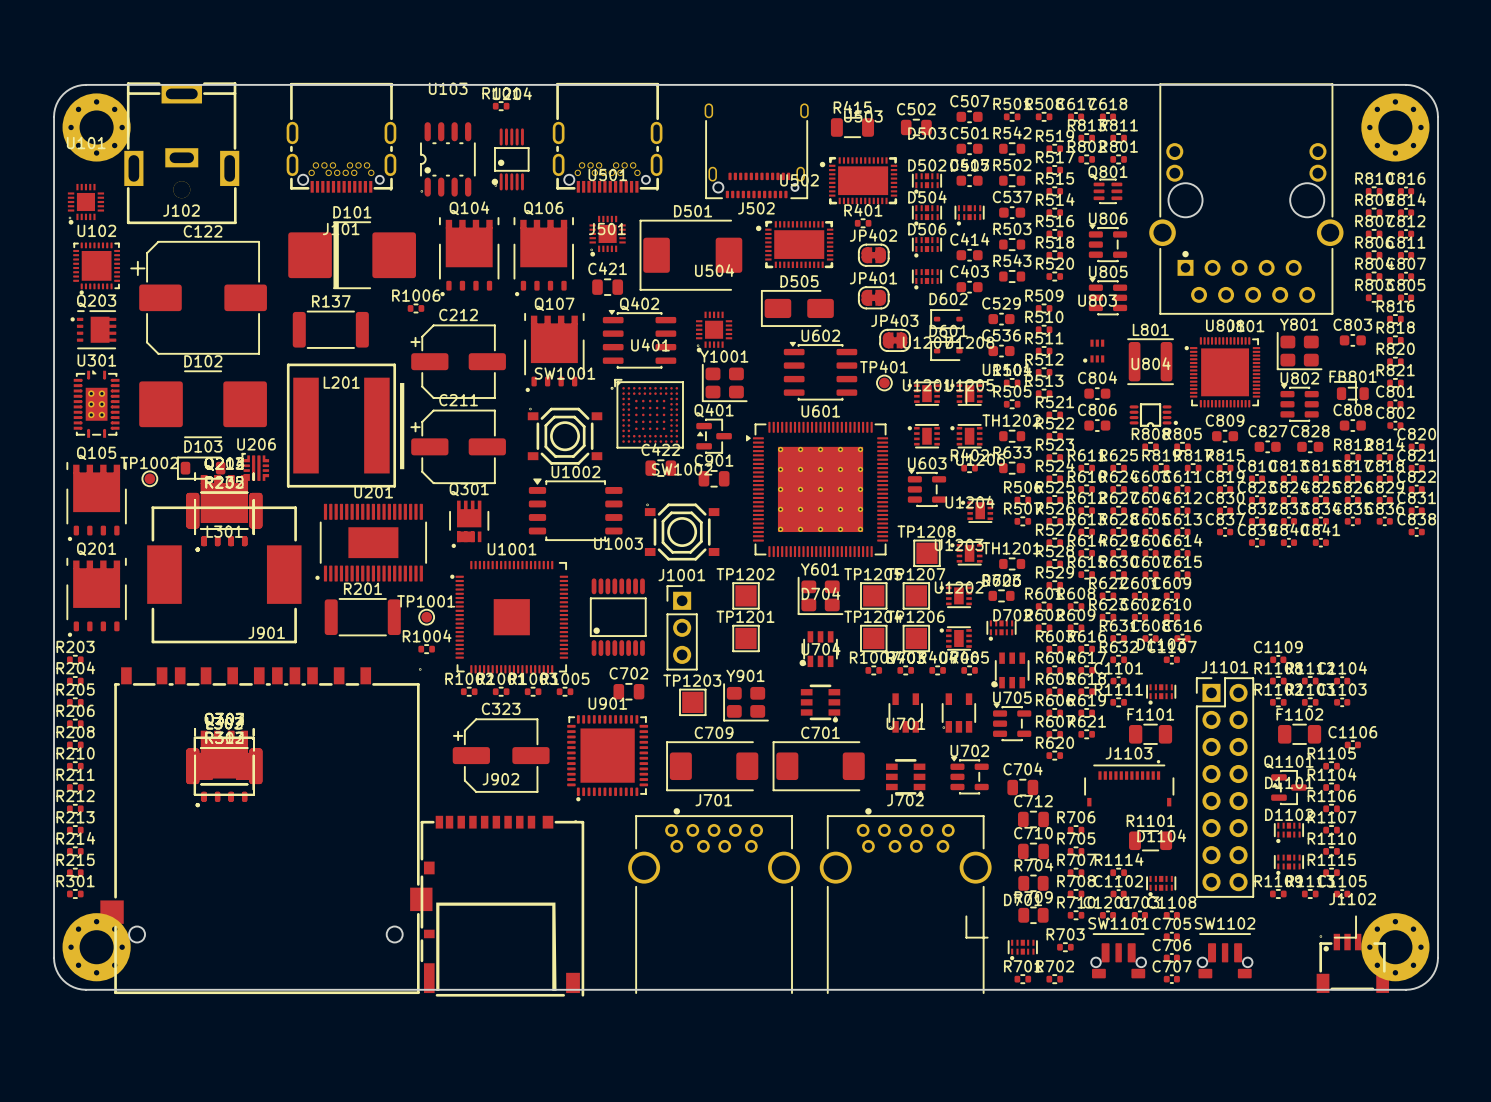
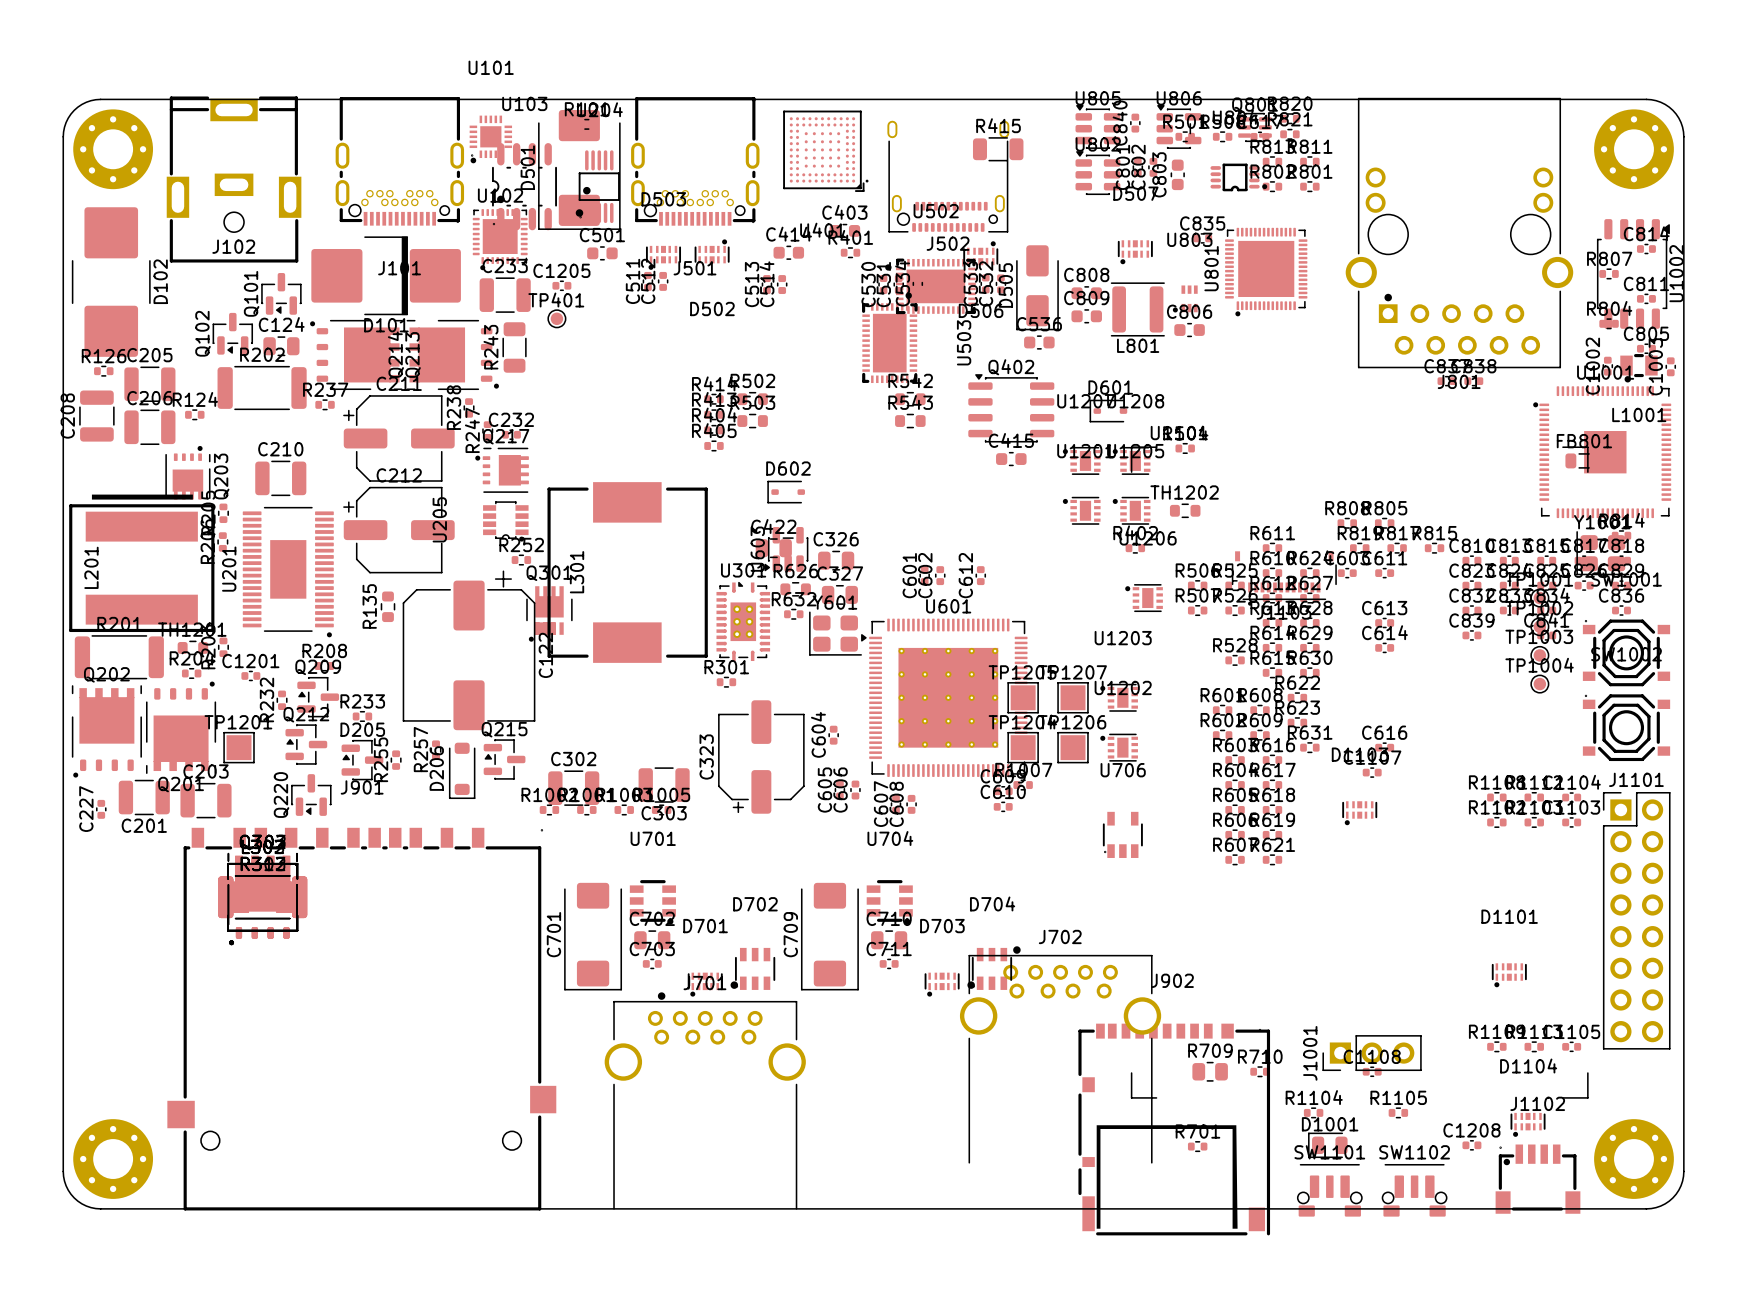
J102 footprint: [124, 82, 240, 225] -> [166, 96, 302, 263]
C507: (969, 116) -> none
C618: (1107, 116) -> none
C502: (916, 127) -> none
J501 position: (607, 137) -> (695, 161)
C501 position: (969, 148) -> (602, 253)
R542 position: (1012, 148) -> (910, 399)
R519: (1054, 148) -> none
J502 position: (756, 151) -> (948, 176)
R517: (1054, 170) -> none
U503 rotation: 0° (858, 180) -> 90° clockwise (889, 337)
U503 position: (858, 180) -> (889, 337)
C415 position: (969, 180) -> (1011, 459)
R502 position: (1012, 180) -> (752, 399)
D503 position: (926, 183) -> (663, 257)
Q801 position: (1107, 190) -> (1254, 126)
R515: (1054, 191) -> none
R810: (1374, 191) -> none
C816: (1406, 191) -> none
U101 position: (85, 204) -> (490, 139)
C537: (1012, 212) -> none
R514: (1054, 212) -> none
R809: (1374, 212) -> none
D502 rotation: 0° (926, 215) -> 180° (712, 251)
D502 position: (926, 215) -> (712, 251)
R401 position: (863, 223) -> (850, 252)
R516: (1054, 233) -> none
C812: (1406, 233) -> none
U501: (607, 236) -> none
C511: none -> (647, 281)
C512: none -> (663, 281)
C513: none -> (766, 284)
C514: none -> (782, 284)
C530: none -> (883, 284)
C531: none -> (898, 284)
C534: none -> (917, 283)
C533: none -> (985, 283)
C532: none -> (1000, 283)
U806 position: (1107, 243) -> (1178, 126)
C1205: none -> (561, 285)
R503 position: (1012, 244) -> (752, 421)
D504: (926, 247) -> none
Q101: none -> (281, 293)
C233: none -> (505, 295)
D101 rotation: 0° (352, 255) -> 180° (386, 275)
D501 rotation: 0° (691, 255) -> 90° counterclockwise (579, 169)
D501 position: (691, 255) -> (579, 169)
JP402: (873, 255) -> none
C414 position: (969, 255) -> (788, 252)
R518: (1054, 255) -> none
R806: (1374, 255) -> none
Q104: (469, 256) -> none
Q106: (543, 256) -> none
U102 position: (96, 268) -> (500, 239)
R543 position: (1012, 276) -> (910, 421)
R520: (1054, 276) -> none
C807: (1406, 276) -> none
D506 rotation: 0° (926, 279) -> 180° (980, 253)
D506 position: (926, 279) -> (980, 253)
Q102: none -> (232, 333)
C421: (607, 287) -> none
C403 position: (969, 287) -> (844, 230)
C124: none -> (281, 346)
R243: none -> (514, 347)
U805 position: (1107, 296) -> (1097, 126)
C122 rotation: 0° (198, 297) -> 90° clockwise (469, 650)
C122 position: (198, 297) -> (469, 650)
JP401: (873, 297) -> none
R803: (1374, 297) -> none
R1006: (415, 308) -> none
D505 rotation: 0° (797, 308) -> 90° counterclockwise (1037, 287)
D505 position: (797, 308) -> (1037, 287)
R509: (1044, 308) -> none
C1002: none -> (1607, 366)
C1003: none -> (1670, 366)
L1001: none -> (1638, 368)
R126: none -> (103, 371)
D602 position: (946, 319) -> (786, 492)
C529: (1001, 319) -> none
R816: (1395, 319) -> none
C212 footprint: [410, 324, 506, 399] -> [343, 486, 455, 574]
C803 name position: C803 (1352, 324) -> C803 (1159, 174)
C205: none -> (149, 384)
Q203 rotation: 0° (93, 329) -> 90° clockwise (187, 472)
Q203 position: (93, 329) -> (187, 472)
R137: (330, 329) -> none
R510: (1044, 329) -> none
L801 name position: L801 (1150, 329) -> L801 (1138, 345)
U504: (714, 332) -> none
Q402 position: (639, 339) -> (1011, 408)
R414: none -> (713, 399)
JP403: (895, 340) -> none
C803 rotation: 0° (1352, 340) -> 90° clockwise (1177, 174)
C803 position: (1352, 340) -> (1177, 174)
R818: (1395, 340) -> none
R237: none -> (325, 404)
R238: none -> (469, 407)
C536 position: (1001, 351) -> (1039, 342)
R511: (1044, 351) -> none
U803 position: (1093, 351) -> (1185, 298)
Y801: (1299, 351) -> none
Q107: (554, 352) -> none
R124: none -> (194, 414)
R413: none -> (713, 414)
C208: none -> (96, 416)
L801 position: (1150, 361) -> (1137, 309)
R820 position: (1395, 361) -> (1289, 118)
C206: none -> (149, 427)
R247: none -> (487, 431)
C232: none -> (511, 434)
U602: (820, 371) -> none
R512: (1044, 372) -> none
U801 rotation: 0° (1222, 372) -> 90° counterclockwise (1266, 272)
U801 position: (1222, 372) -> (1266, 272)
Y1001 position: (724, 382) -> (1602, 553)
TP401 position: (884, 382) -> (556, 318)
R821 position: (1395, 382) -> (1289, 134)
R513: (1044, 393) -> none
C804: (1097, 393) -> none
Q217: none -> (502, 470)
U802 position: (1299, 402) -> (1097, 173)
U301 position: (96, 404) -> (743, 621)
D102 rotation: 0° (203, 404) -> 90° clockwise (111, 282)
D102 position: (203, 404) -> (111, 282)
R505: (1012, 404) -> none
C801 rotation: 0° (1395, 404) -> 90° clockwise (1137, 167)
C801 position: (1395, 404) -> (1137, 167)
C210: none -> (280, 478)
U401 rotation: 0° (647, 413) -> 180° (825, 151)
U401 position: (647, 413) -> (825, 151)
R521: (1054, 414) -> none
U804 position: (1153, 415) -> (1238, 177)
L201 rotation: 0° (345, 425) -> 90° counterclockwise (141, 563)
L201 position: (345, 425) -> (141, 563)
C806 position: (1097, 425) -> (1189, 330)
C808 position: (1352, 425) -> (1086, 293)
C802 rotation: 0° (1395, 425) -> 90° clockwise (1153, 167)
C802 position: (1395, 425) -> (1153, 167)
SW1001 position: (565, 436) -> (1626, 652)
Q401: (714, 436) -> none
R522: (1054, 436) -> none
C809 position: (1225, 436) -> (1086, 316)
U205: none -> (505, 521)
C211 position: (458, 446) -> (398, 438)
C827: (1267, 446) -> none
C828: (1310, 446) -> none
C820: (1416, 446) -> none
R523: (1054, 457) -> none
R812: (1352, 457) -> none
C901 name: C901 (714, 460) -> C326 (836, 539)
U206: (255, 467) -> none
D103: (201, 468) -> none
R633: (1012, 468) -> none
R625: (1118, 468) -> none
C821: (1416, 468) -> none
TP1002 position: (149, 478) -> (1539, 626)
R252: none -> (521, 560)
R524: (1054, 478) -> none
U603 rotation: 0° (926, 487) -> 90° counterclockwise (786, 549)
U603 position: (926, 487) -> (786, 549)
U601 position: (817, 489) -> (944, 697)
C819: (1225, 489) -> none
C822: (1416, 489) -> none
Q105: (96, 501) -> none
C327: none -> (839, 594)
U1002 rotation: 0° (575, 509) -> 90° clockwise (1633, 273)
U1002 position: (575, 509) -> (1633, 273)
R202 position: (224, 510) -> (262, 388)
part: (224, 510) -> none
C604 rotation: 0° (1150, 510) -> 90° clockwise (833, 735)
C604 position: (1150, 510) -> (833, 735)
C612 rotation: 0° (1182, 510) -> 90° clockwise (980, 575)
C612 position: (1182, 510) -> (980, 575)
C830: (1225, 510) -> none
C831: (1416, 510) -> none
Q214 rotation: 0° (224, 512) -> 90° counterclockwise (452, 354)
Q214 position: (224, 512) -> (452, 354)
Q202 position: (224, 512) -> (106, 731)
Q213 rotation: 0° (224, 512) -> 90° clockwise (356, 354)
Q213 position: (224, 512) -> (356, 354)
R135: none -> (388, 606)
C835 position: (1352, 521) -> (1202, 238)
SW1002 position: (682, 532) -> (1626, 727)
C605 rotation: 0° (1150, 532) -> 90° clockwise (839, 790)
C605 position: (1150, 532) -> (839, 790)
C837 position: (1225, 532) -> (1446, 381)
C838 position: (1416, 532) -> (1473, 381)
U201 rotation: 0° (371, 542) -> 90° counterclockwise (288, 572)
U201 position: (371, 542) -> (288, 572)
R527: (1054, 542) -> none
C840 rotation: 0° (1288, 542) -> 90° clockwise (1135, 123)
C840 position: (1288, 542) -> (1135, 123)
TP1208: (926, 553) -> none
U1204: (966, 553) -> none
C606 rotation: 0° (1150, 553) -> 90° clockwise (855, 790)
C606 position: (1150, 553) -> (855, 790)
TP1003: none -> (1539, 655)
TH1201 position: (1012, 563) -> (192, 647)
L301 rotation: 0° (224, 574) -> 90° counterclockwise (627, 572)
L301 position: (224, 574) -> (627, 572)
C607 rotation: 0° (1150, 574) -> 90° clockwise (895, 804)
C607 position: (1150, 574) -> (895, 804)
C615: (1182, 574) -> none
TP1004: none -> (1539, 684)
R529: (1054, 585) -> none
Q209: none -> (318, 697)
TP1202: (746, 595) -> none
Y601 position: (820, 595) -> (835, 633)
R626 position: (1001, 595) -> (795, 589)
C601 rotation: 0° (1139, 595) -> 90° clockwise (924, 575)
C601 position: (1139, 595) -> (924, 575)
C609 position: (1171, 595) -> (1003, 791)
Q201 rotation: 0° (96, 597) -> 180° (181, 727)
Q201 position: (96, 597) -> (181, 727)
R232: none -> (282, 700)
R233: none -> (362, 716)
R201 position: (362, 617) -> (119, 657)
TP1001 position: (426, 617) -> (1539, 598)
U1001 position: (509, 617) -> (1602, 452)
U1003: (618, 617) -> none
C602 rotation: 0° (1139, 617) -> 90° clockwise (940, 575)
C602 position: (1139, 617) -> (940, 575)
C610 position: (1171, 617) -> (1003, 806)
J1001 rotation: 0° (682, 627) -> 90° counterclockwise (1372, 1053)
J1001 position: (682, 627) -> (1372, 1053)
D703 position: (1001, 630) -> (942, 984)
Q212: none -> (306, 744)
TP1201 position: (746, 638) -> (239, 747)
C608 rotation: 0° (1150, 638) -> 90° clockwise (911, 804)
C608 position: (1150, 638) -> (911, 804)
R257: none -> (435, 750)
Q215: none -> (504, 759)
D205: none -> (362, 760)
R255: none -> (396, 760)
R1004: (426, 649) -> none
D704 position: (818, 649) -> (989, 968)
D206: none -> (462, 770)
R203 rotation: 0° (75, 659) -> 90° clockwise (223, 647)
R203 position: (75, 659) -> (223, 647)
R632 position: (1118, 659) -> (793, 614)
C1109: (1278, 659) -> none
C303: none -> (664, 785)
part: (905, 670) -> none
R404 position: (937, 670) -> (713, 430)
R405 position: (969, 670) -> (713, 445)
D702 position: (1010, 670) -> (752, 968)
C302: none -> (573, 788)
Q220: none -> (311, 795)
R204 position: (75, 681) -> (191, 673)
C201: none -> (144, 797)
C1101: (1118, 681) -> none
C203: none -> (205, 800)
C227: none -> (101, 809)
C702 position: (628, 691) -> (652, 940)
R205 rotation: 0° (75, 702) -> 90° clockwise (223, 513)
R205 position: (75, 702) -> (223, 513)
TP1203: (692, 702) -> none
Y901: (746, 702) -> none
R1111: (1118, 702) -> none
U704 position: (820, 703) -> (889, 902)
C323 name position: C323 (501, 708) -> C323 (706, 756)
part: (905, 713) -> none
C323 footprint: [452, 718, 550, 793] -> [718, 700, 805, 814]
U705: (1012, 722) -> none
R206 rotation: 0° (75, 723) -> 90° clockwise (222, 541)
R206 position: (75, 723) -> (222, 541)
F1101: (1150, 734) -> none
F1102: (1299, 734) -> none
R208 position: (75, 744) -> (324, 665)
C1106: (1352, 744) -> none
R620: (1054, 755) -> none
U901: (607, 758) -> none
R210: (75, 766) -> none
C709 rotation: 0° (712, 766) -> 90° counterclockwise (829, 936)
C701 rotation: 0° (818, 766) -> 90° counterclockwise (593, 936)
C701 position: (818, 766) -> (593, 936)
R1105 position: (1331, 766) -> (1398, 1112)
U702: (969, 775) -> none
U701 position: (905, 778) -> (652, 902)
J1103 rotation: 0° (1129, 783) -> 180° (1284, 578)
J1103 position: (1129, 783) -> (1284, 578)
R211: (75, 787) -> none
C704: (1022, 787) -> none
J1101 position: (1225, 787) -> (1636, 920)
Q1101: (1288, 787) -> none
R1104 position: (1331, 787) -> (1313, 1112)
R212: (75, 808) -> none
R1106: (1331, 808) -> none
C712: (1033, 819) -> none
C711: none -> (889, 963)
R213: (75, 830) -> none
J901 position: (266, 830) -> (361, 1019)
R706: (1076, 830) -> none
R1107: (1331, 830) -> none
R1101: (1150, 840) -> none
R214: (75, 851) -> none
C710 position: (1033, 851) -> (889, 940)
R705: (1076, 851) -> none
R1110: (1331, 851) -> none
D1102: (1288, 864) -> none
R215: (75, 872) -> none
R707: (1076, 872) -> none
R1114: (1118, 872) -> none
R1115: (1331, 872) -> none
R704: (1033, 883) -> none
D1104 position: (1161, 886) -> (1528, 1124)
R301 position: (75, 893) -> (726, 682)
R708: (1076, 893) -> none
C1102: (1118, 893) -> none
J701 position: (714, 900) -> (705, 1101)
J902 position: (502, 906) -> (1174, 1129)
C1201 position: (1107, 915) -> (250, 675)
C703 position: (1139, 915) -> (652, 963)
C705: (1171, 936) -> none
part position: (96, 947) -> (113, 1159)
R703: (1065, 947) -> none
part position: (1395, 947) -> (1633, 1159)
D701 position: (1022, 949) -> (705, 984)
SW1101 position: (1118, 955) -> (1329, 1190)
SW1102 position: (1225, 955) -> (1414, 1190)
board edge: (54, 957) (56, 970) (63, 980) (73, 987) (85, 989) (1406, 989) (1418, 987) (1428, 980) (1435, 970) (1438, 957) -> (63, 1121) (63, 1171) (66, 1185) (74, 1197) (81, 1203) (100, 1208) (1646, 1208) (1656, 1207) (1669, 1201) (1681, 1185) (1683, 1171) (1683, 1121)
C706: (1171, 957) -> none
J1102 position: (1352, 963) -> (1537, 1179)
D1001: none -> (1327, 1145)
C1208: none -> (1471, 1145)
R702: (1054, 979) -> none
C707: (1171, 979) -> none

